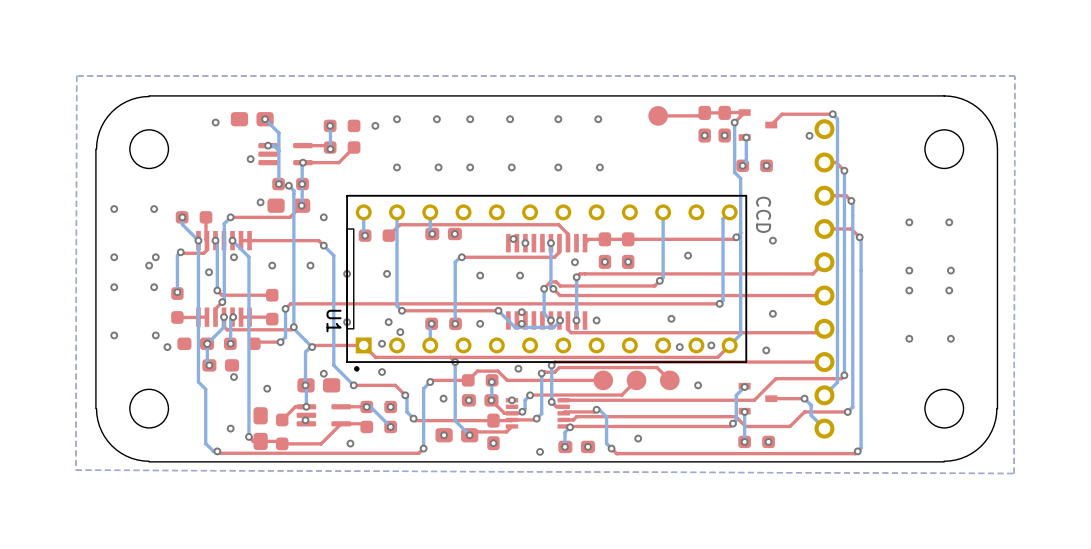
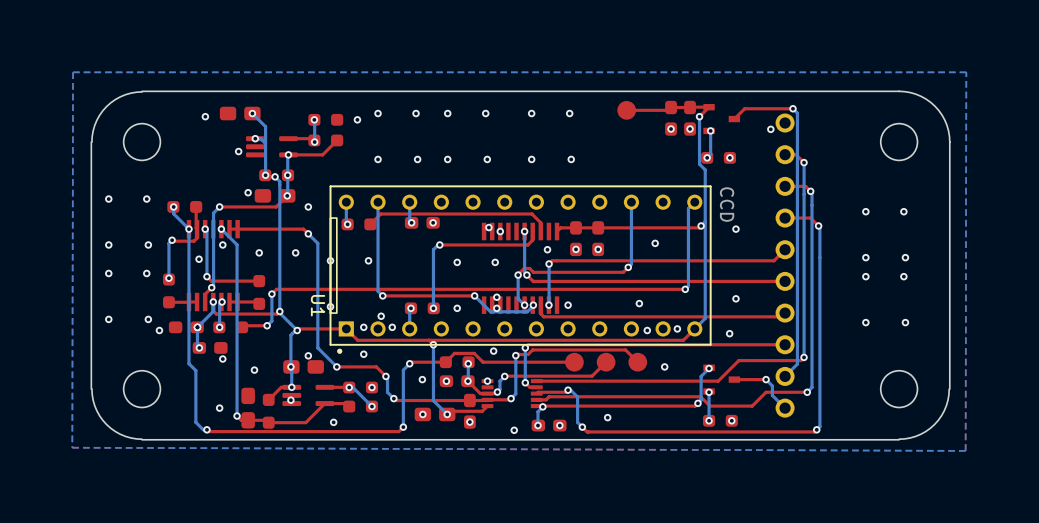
via: (149, 265) -> none
via position: (388, 322) -> (392, 327)

